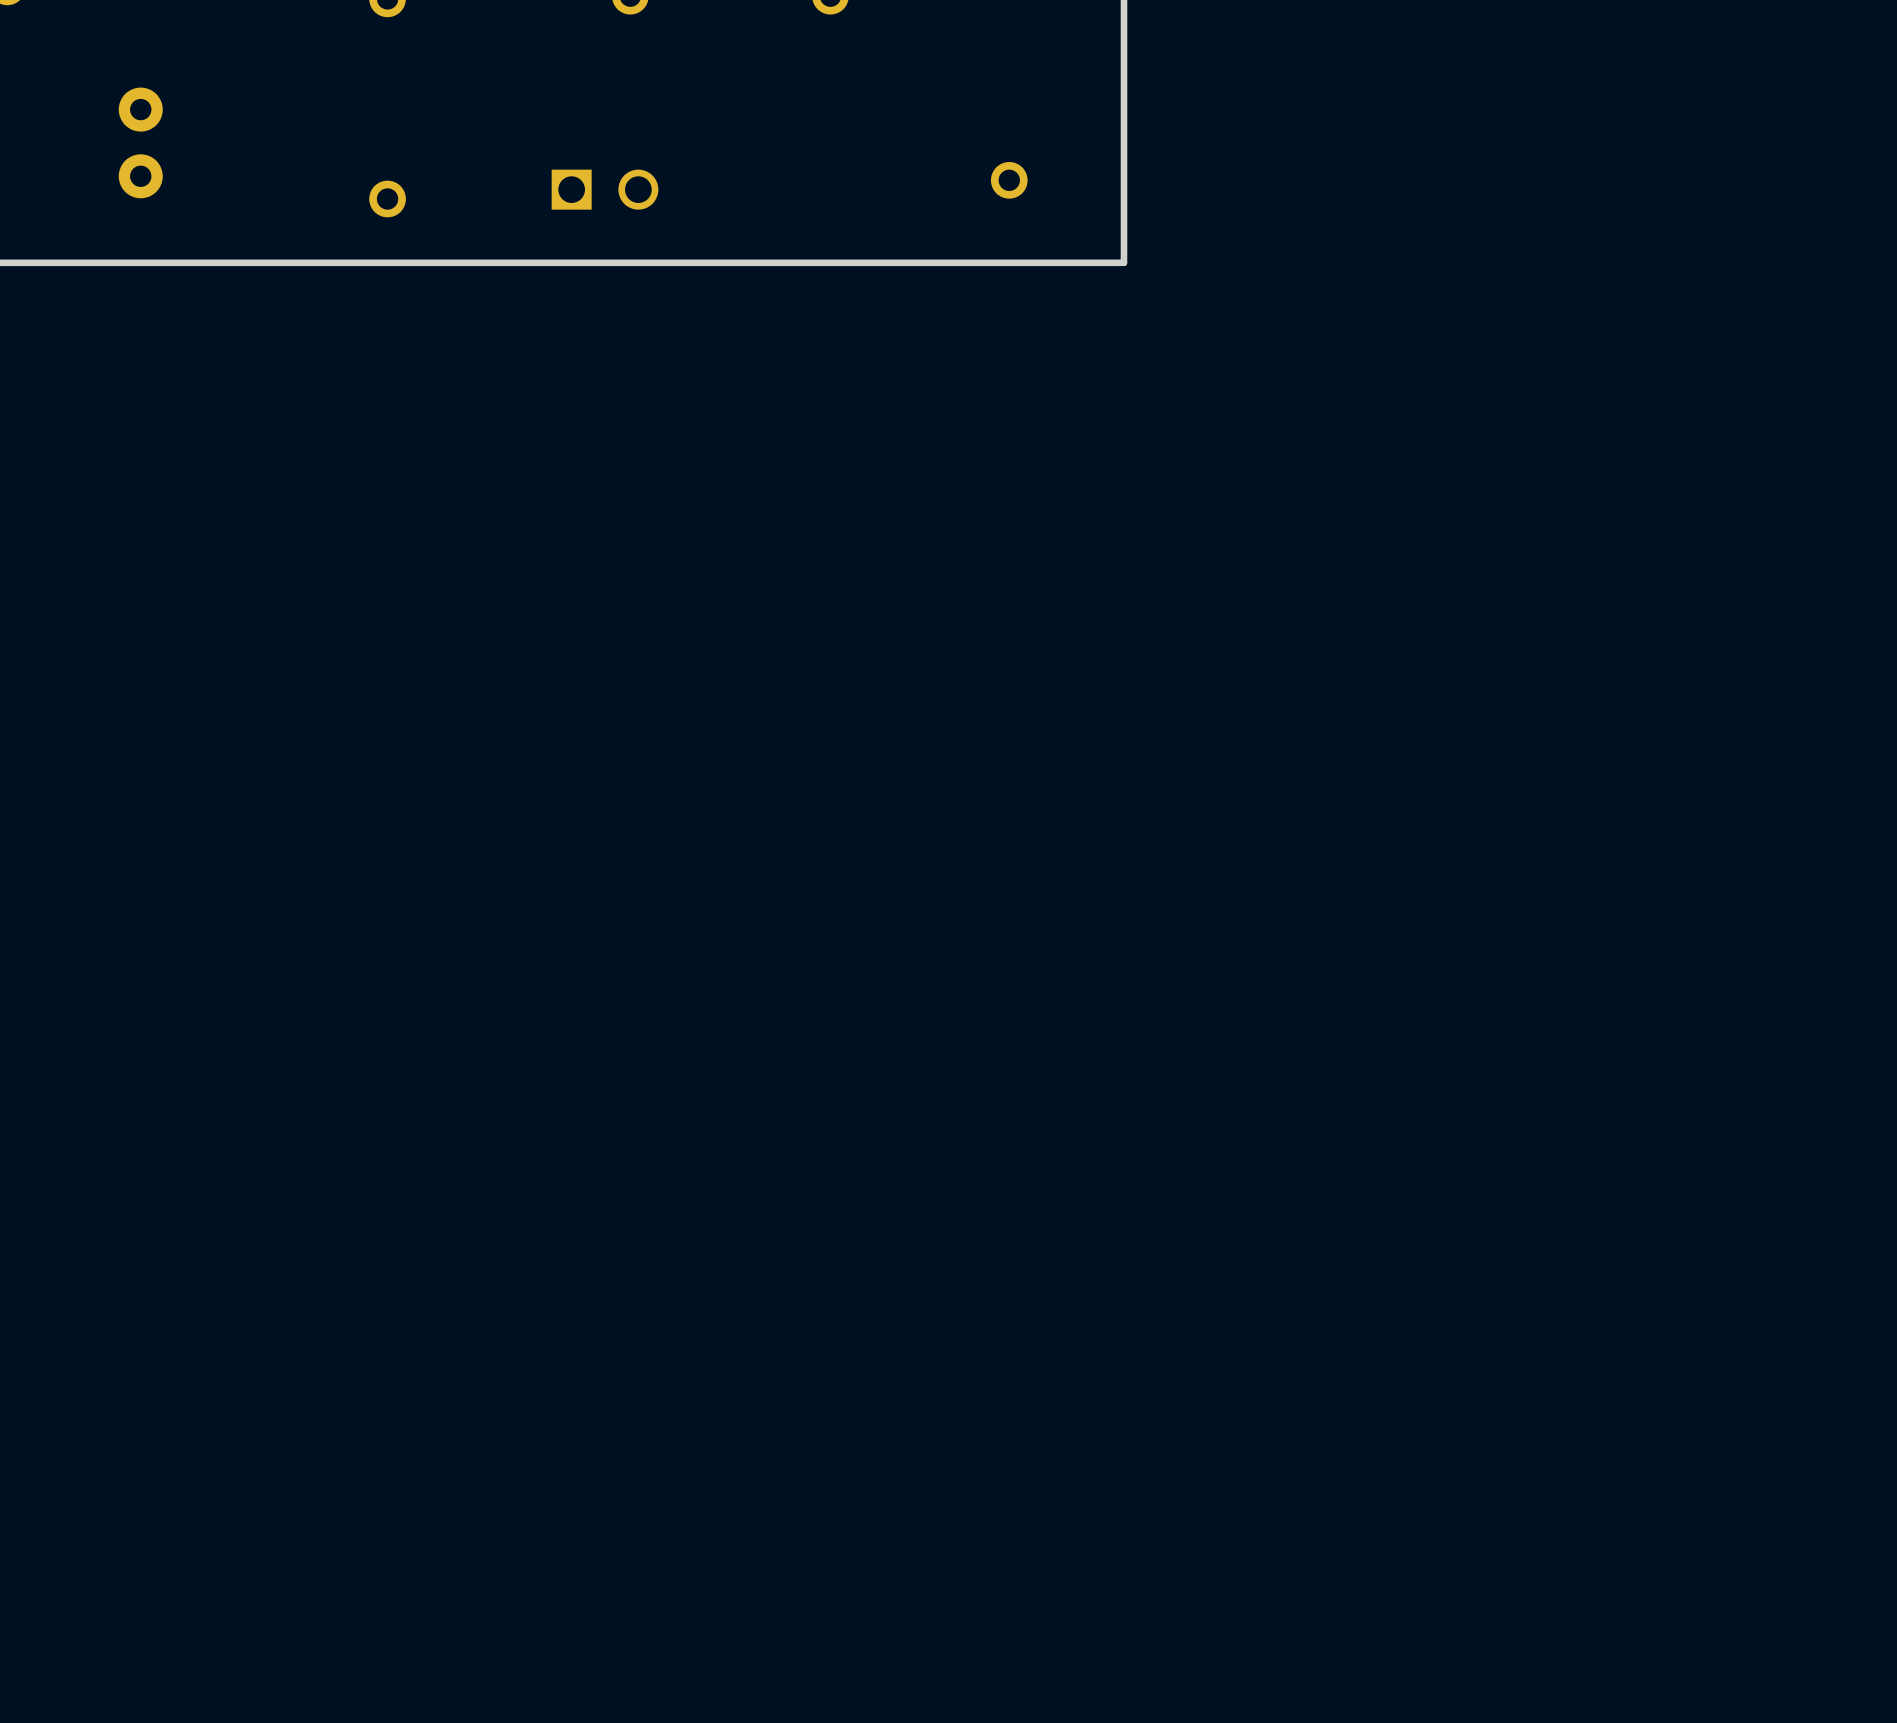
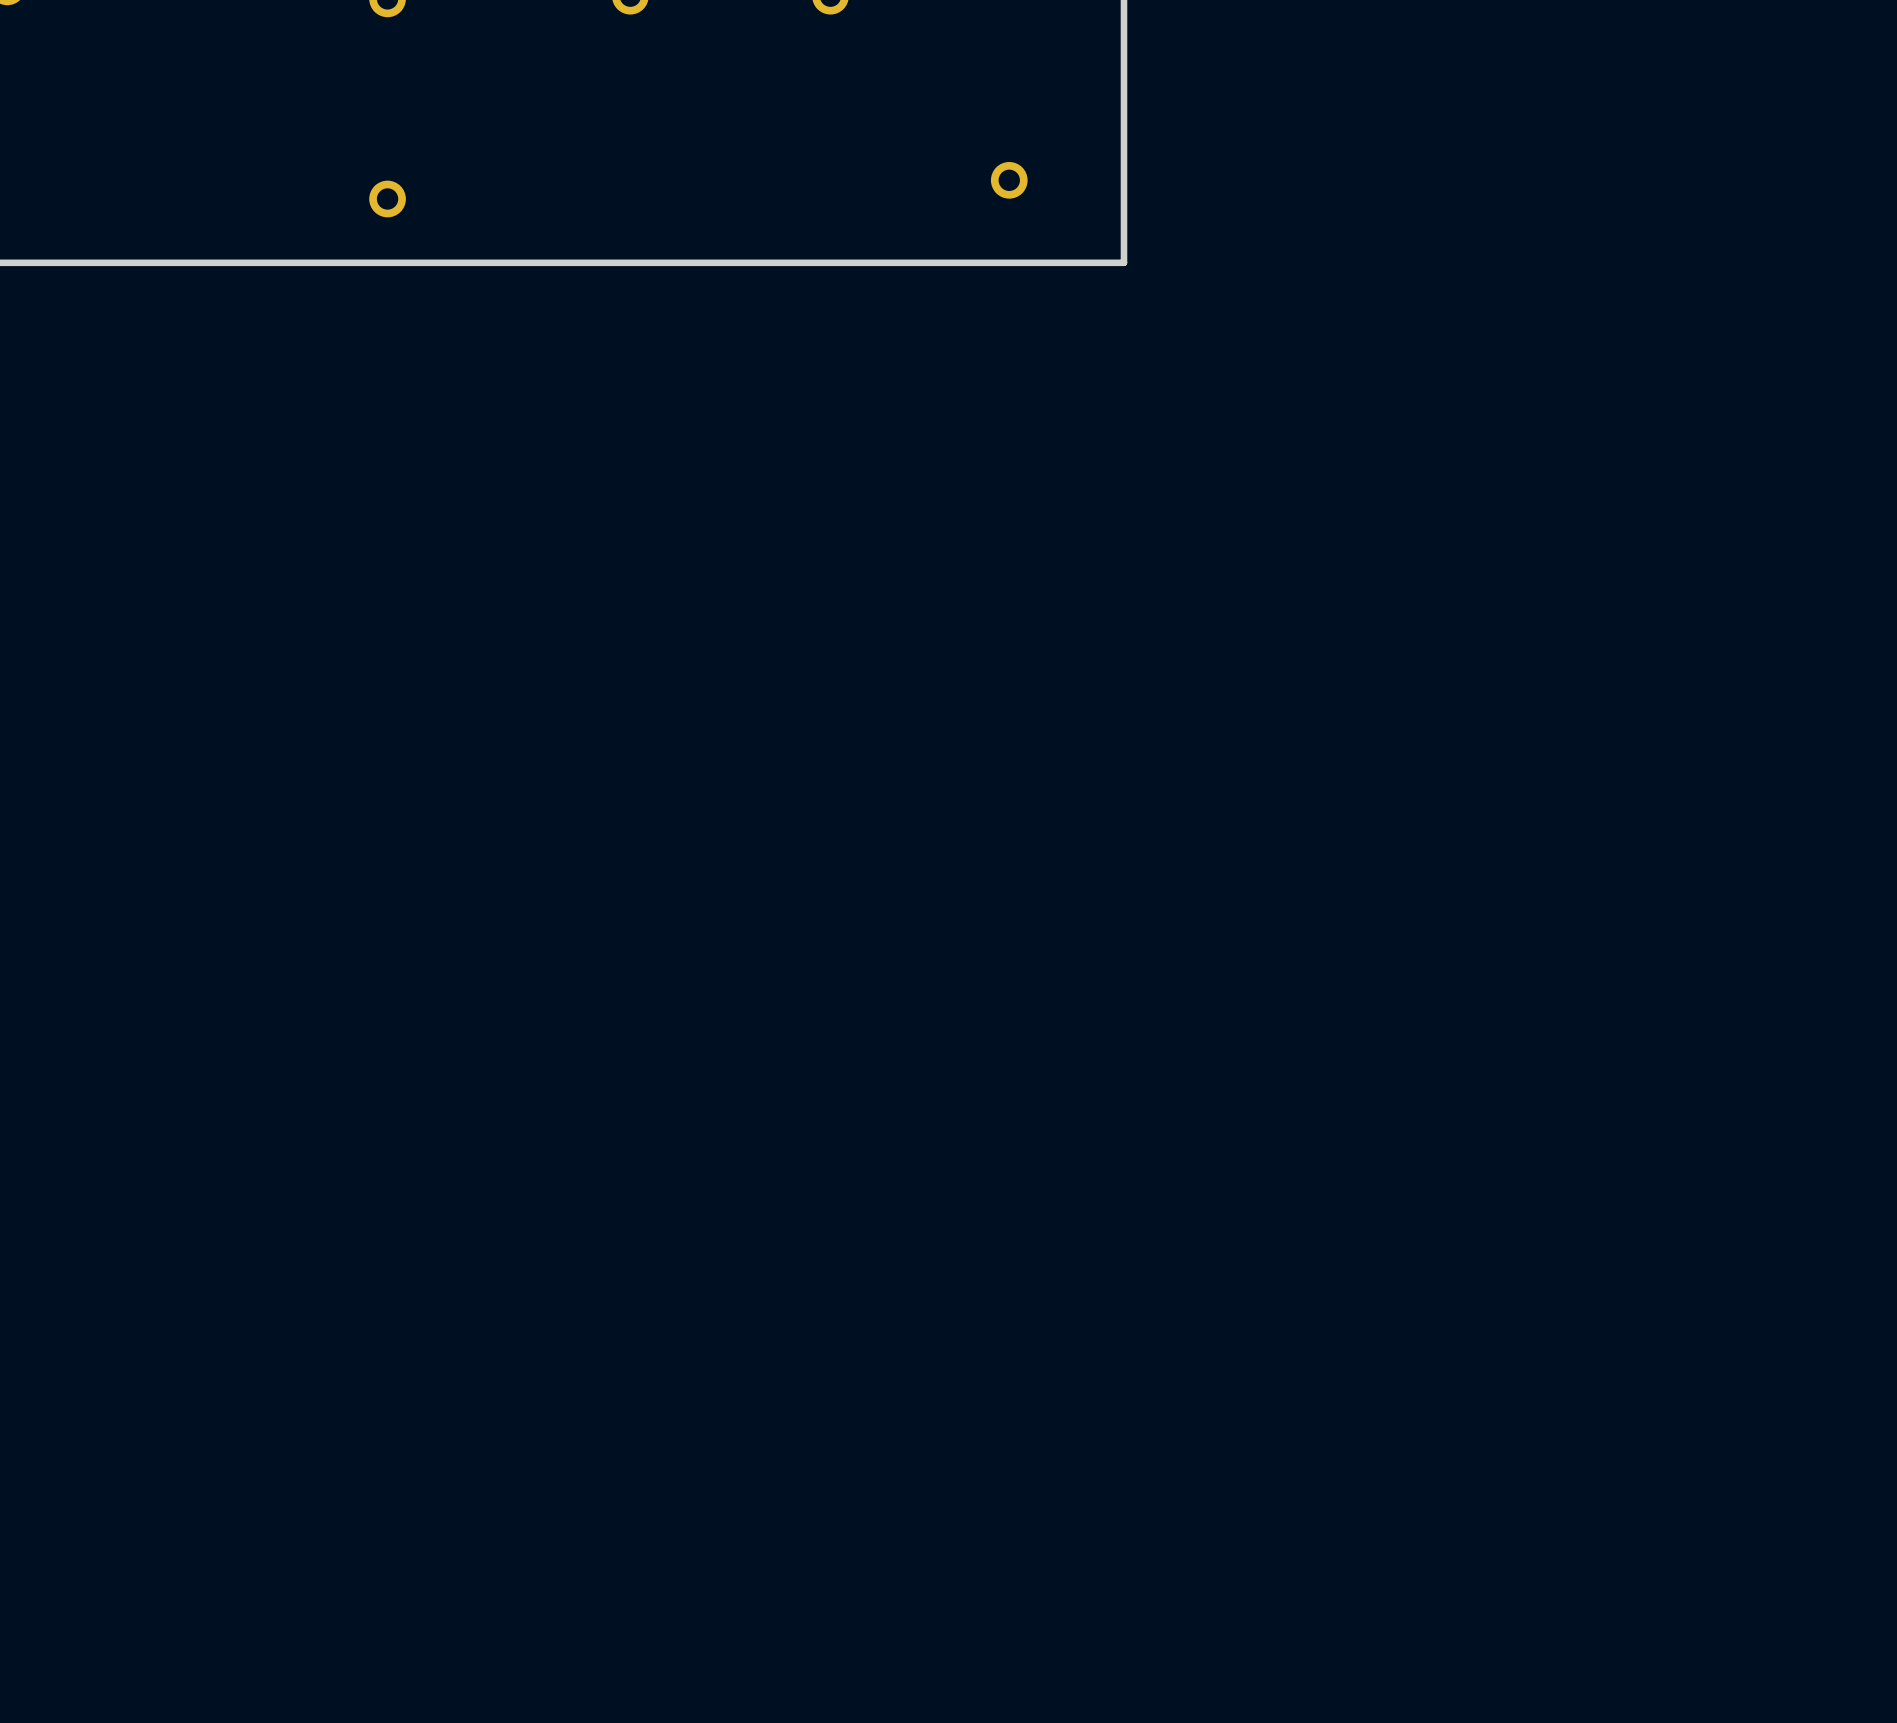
part: (140, 142) -> none
part: (605, 189) -> none

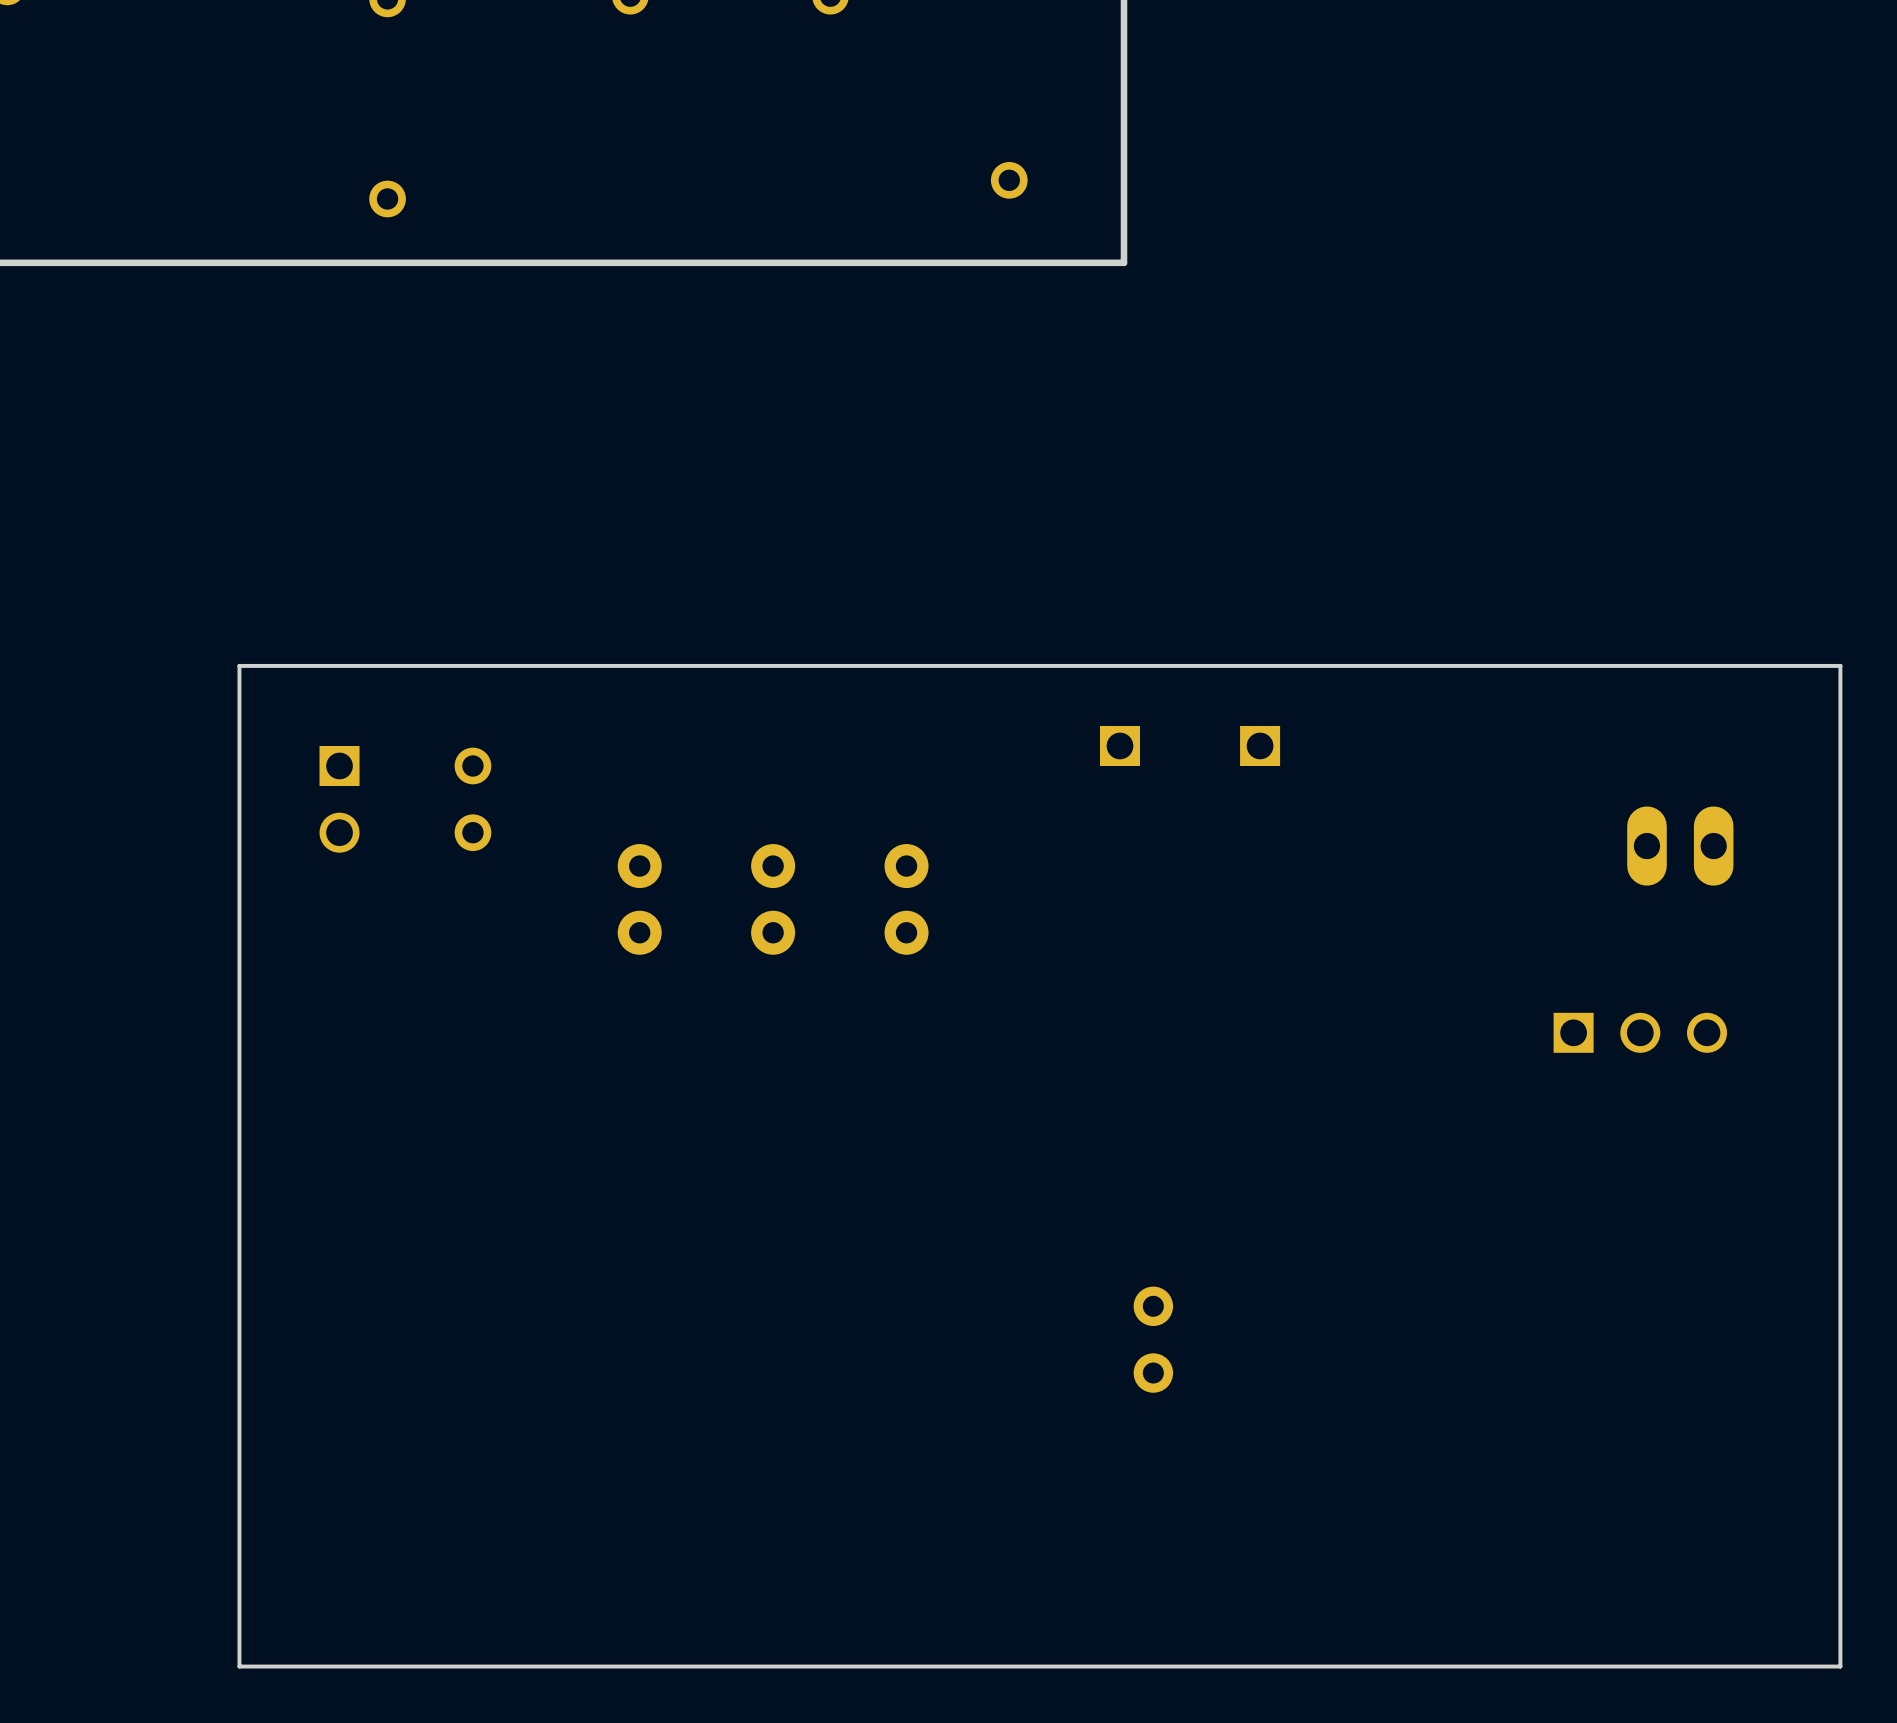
board edge: none -> (1840, 665) (1840, 1666) (239, 1666) (239, 665) (1840, 665)
part: none -> (1119, 745)
part: none -> (1260, 745)
part: none -> (339, 799)
part: none -> (472, 799)
part: none -> (1680, 846)
part: none -> (639, 899)
part: none -> (773, 899)
part: none -> (906, 899)
part: none -> (1640, 1032)
part: none -> (1153, 1339)

